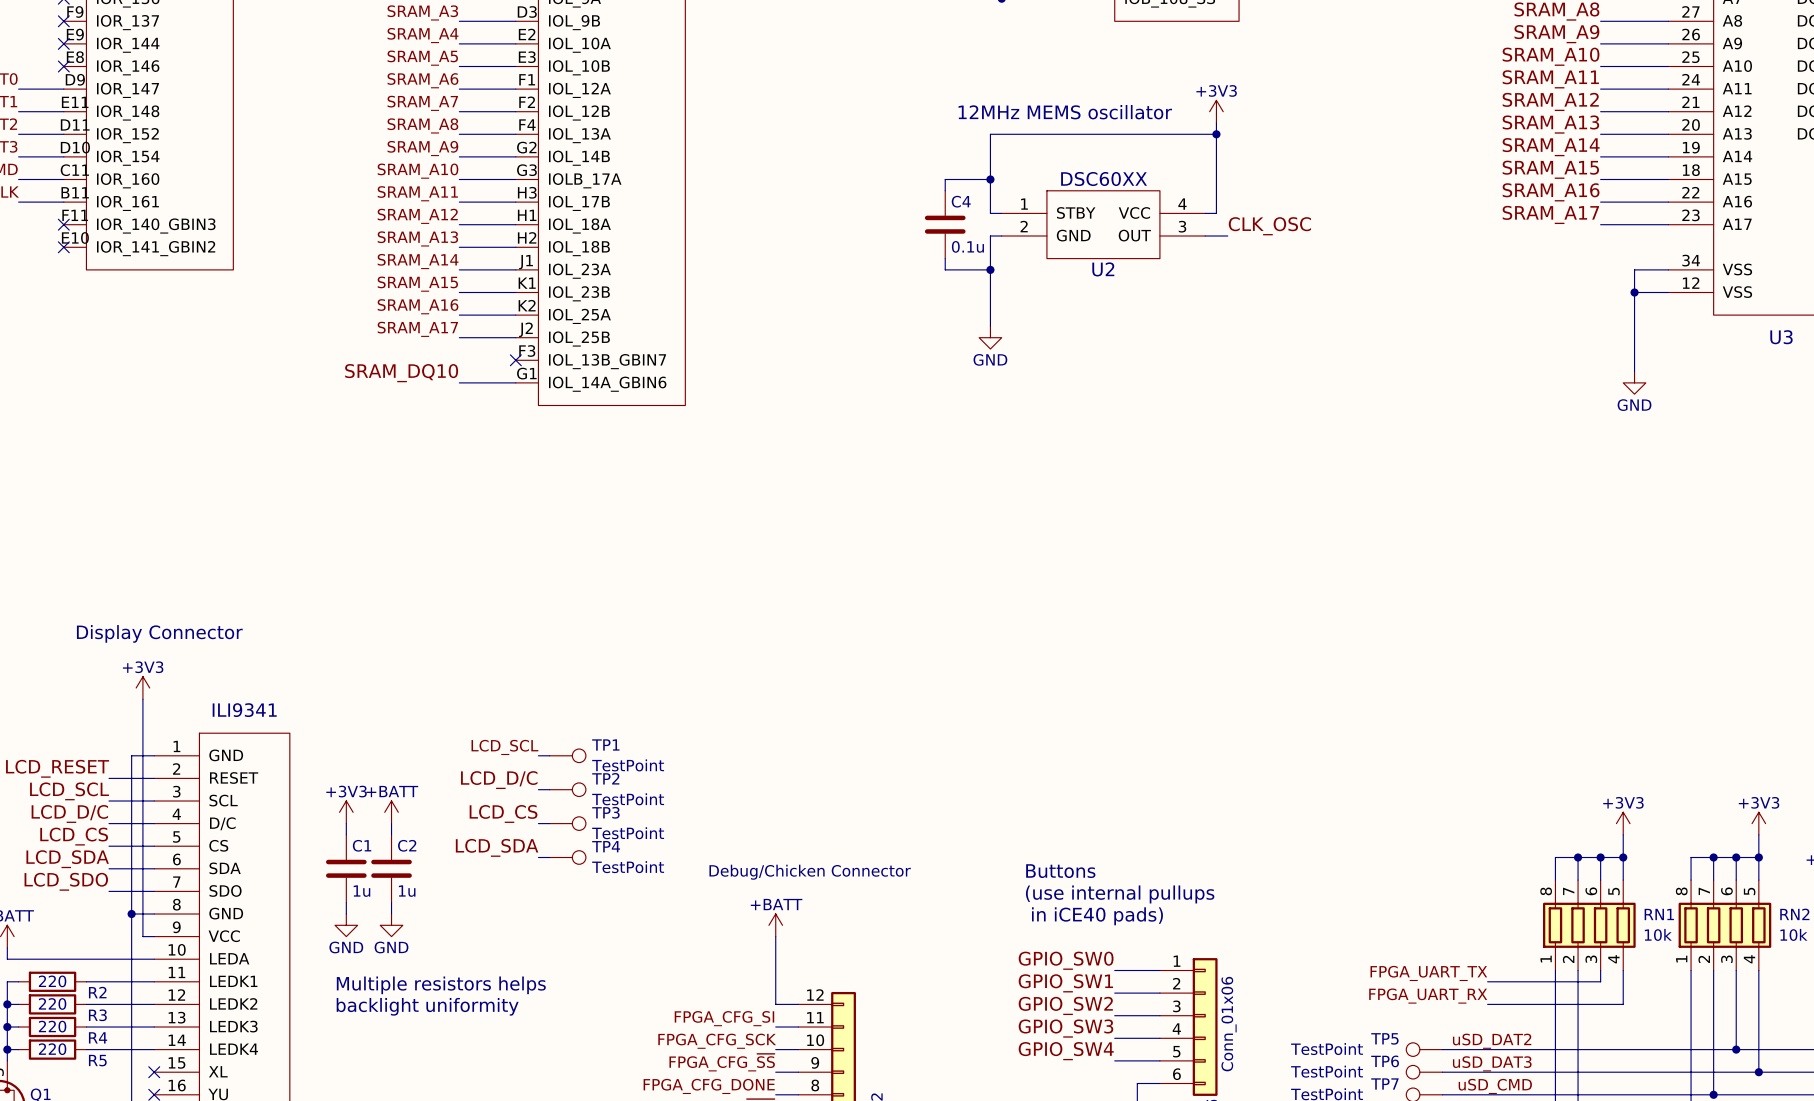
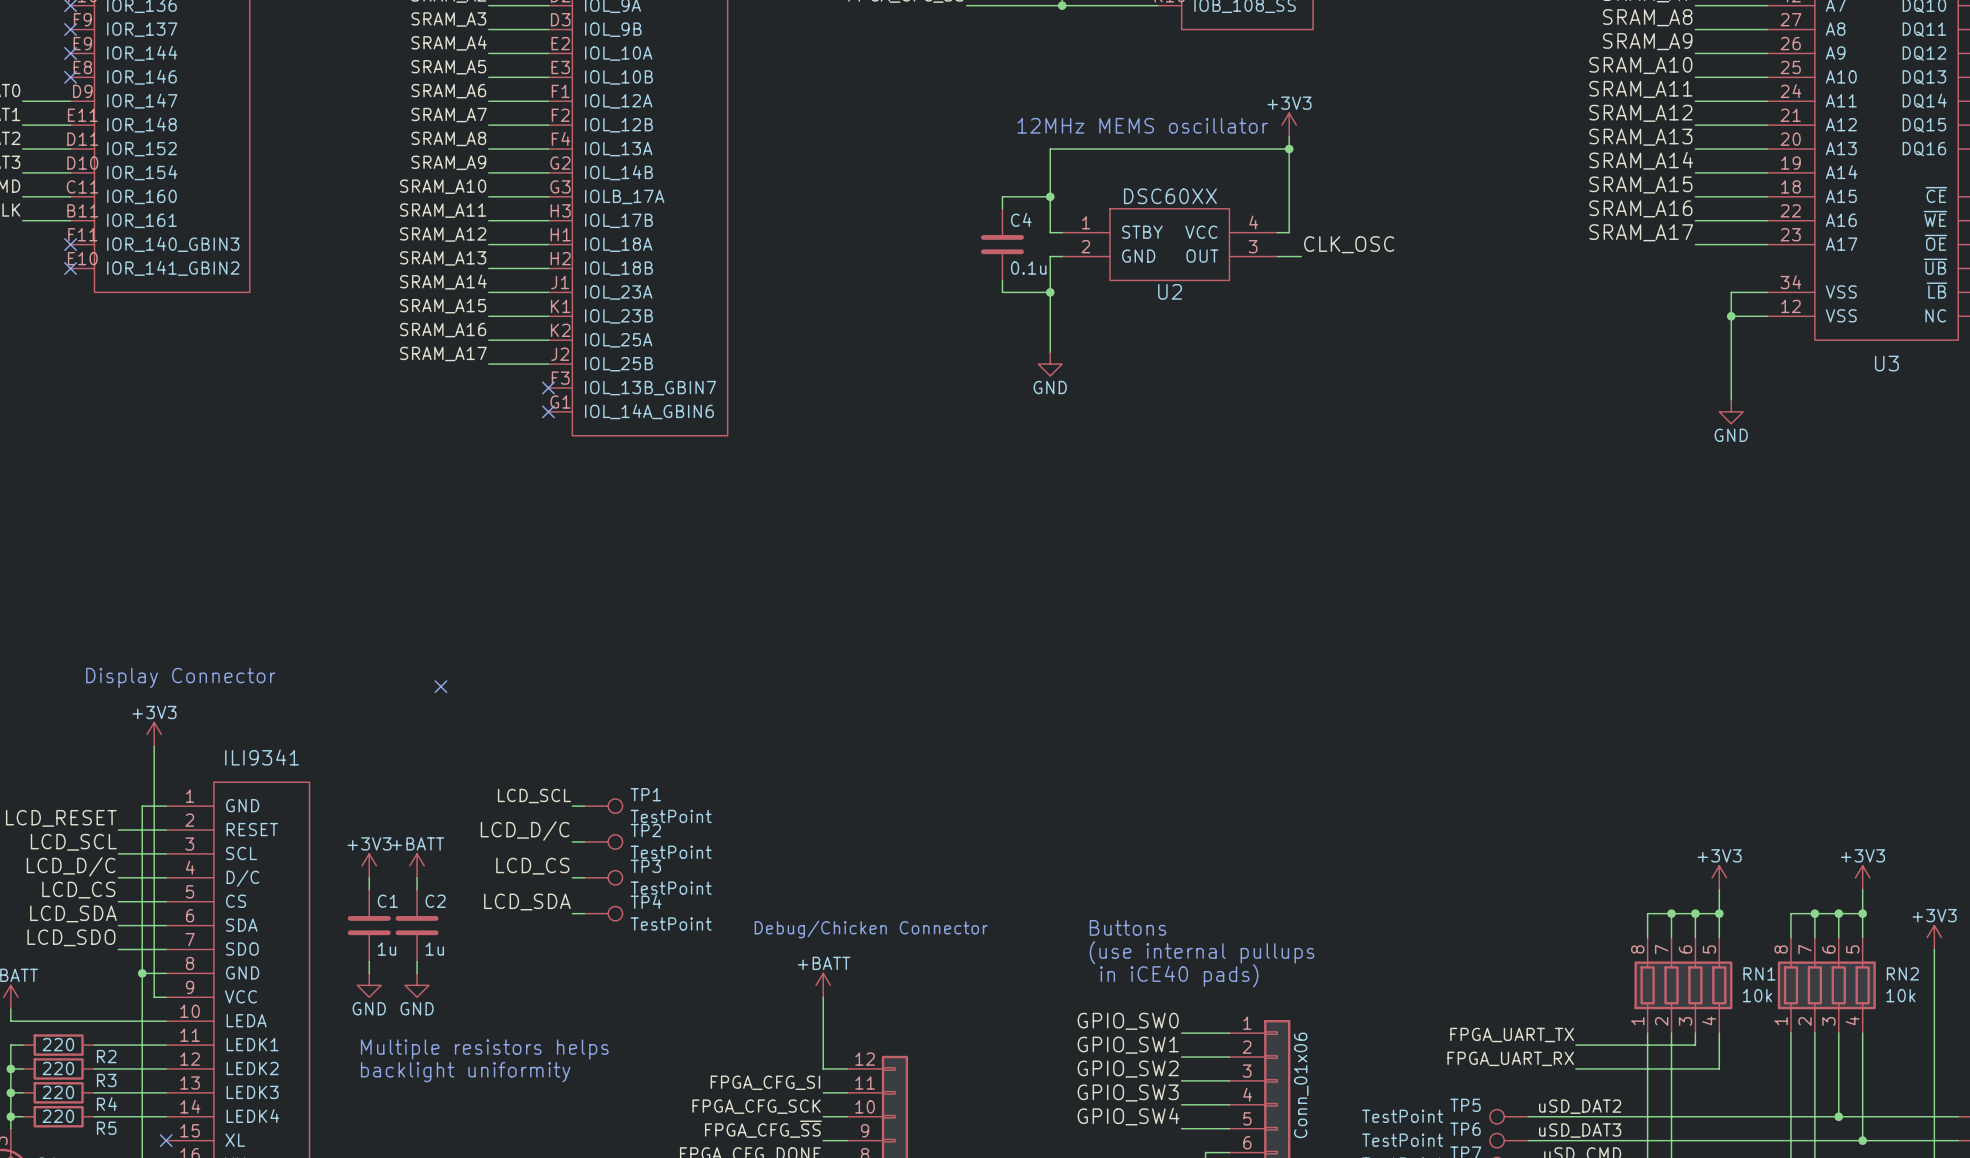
label: SRAM_DQ10 (401, 373) -> none
wire: (459, 382) (515, 382) -> none
no-connect mark: none -> (548, 411)
no-connect mark: none -> (440, 686)

